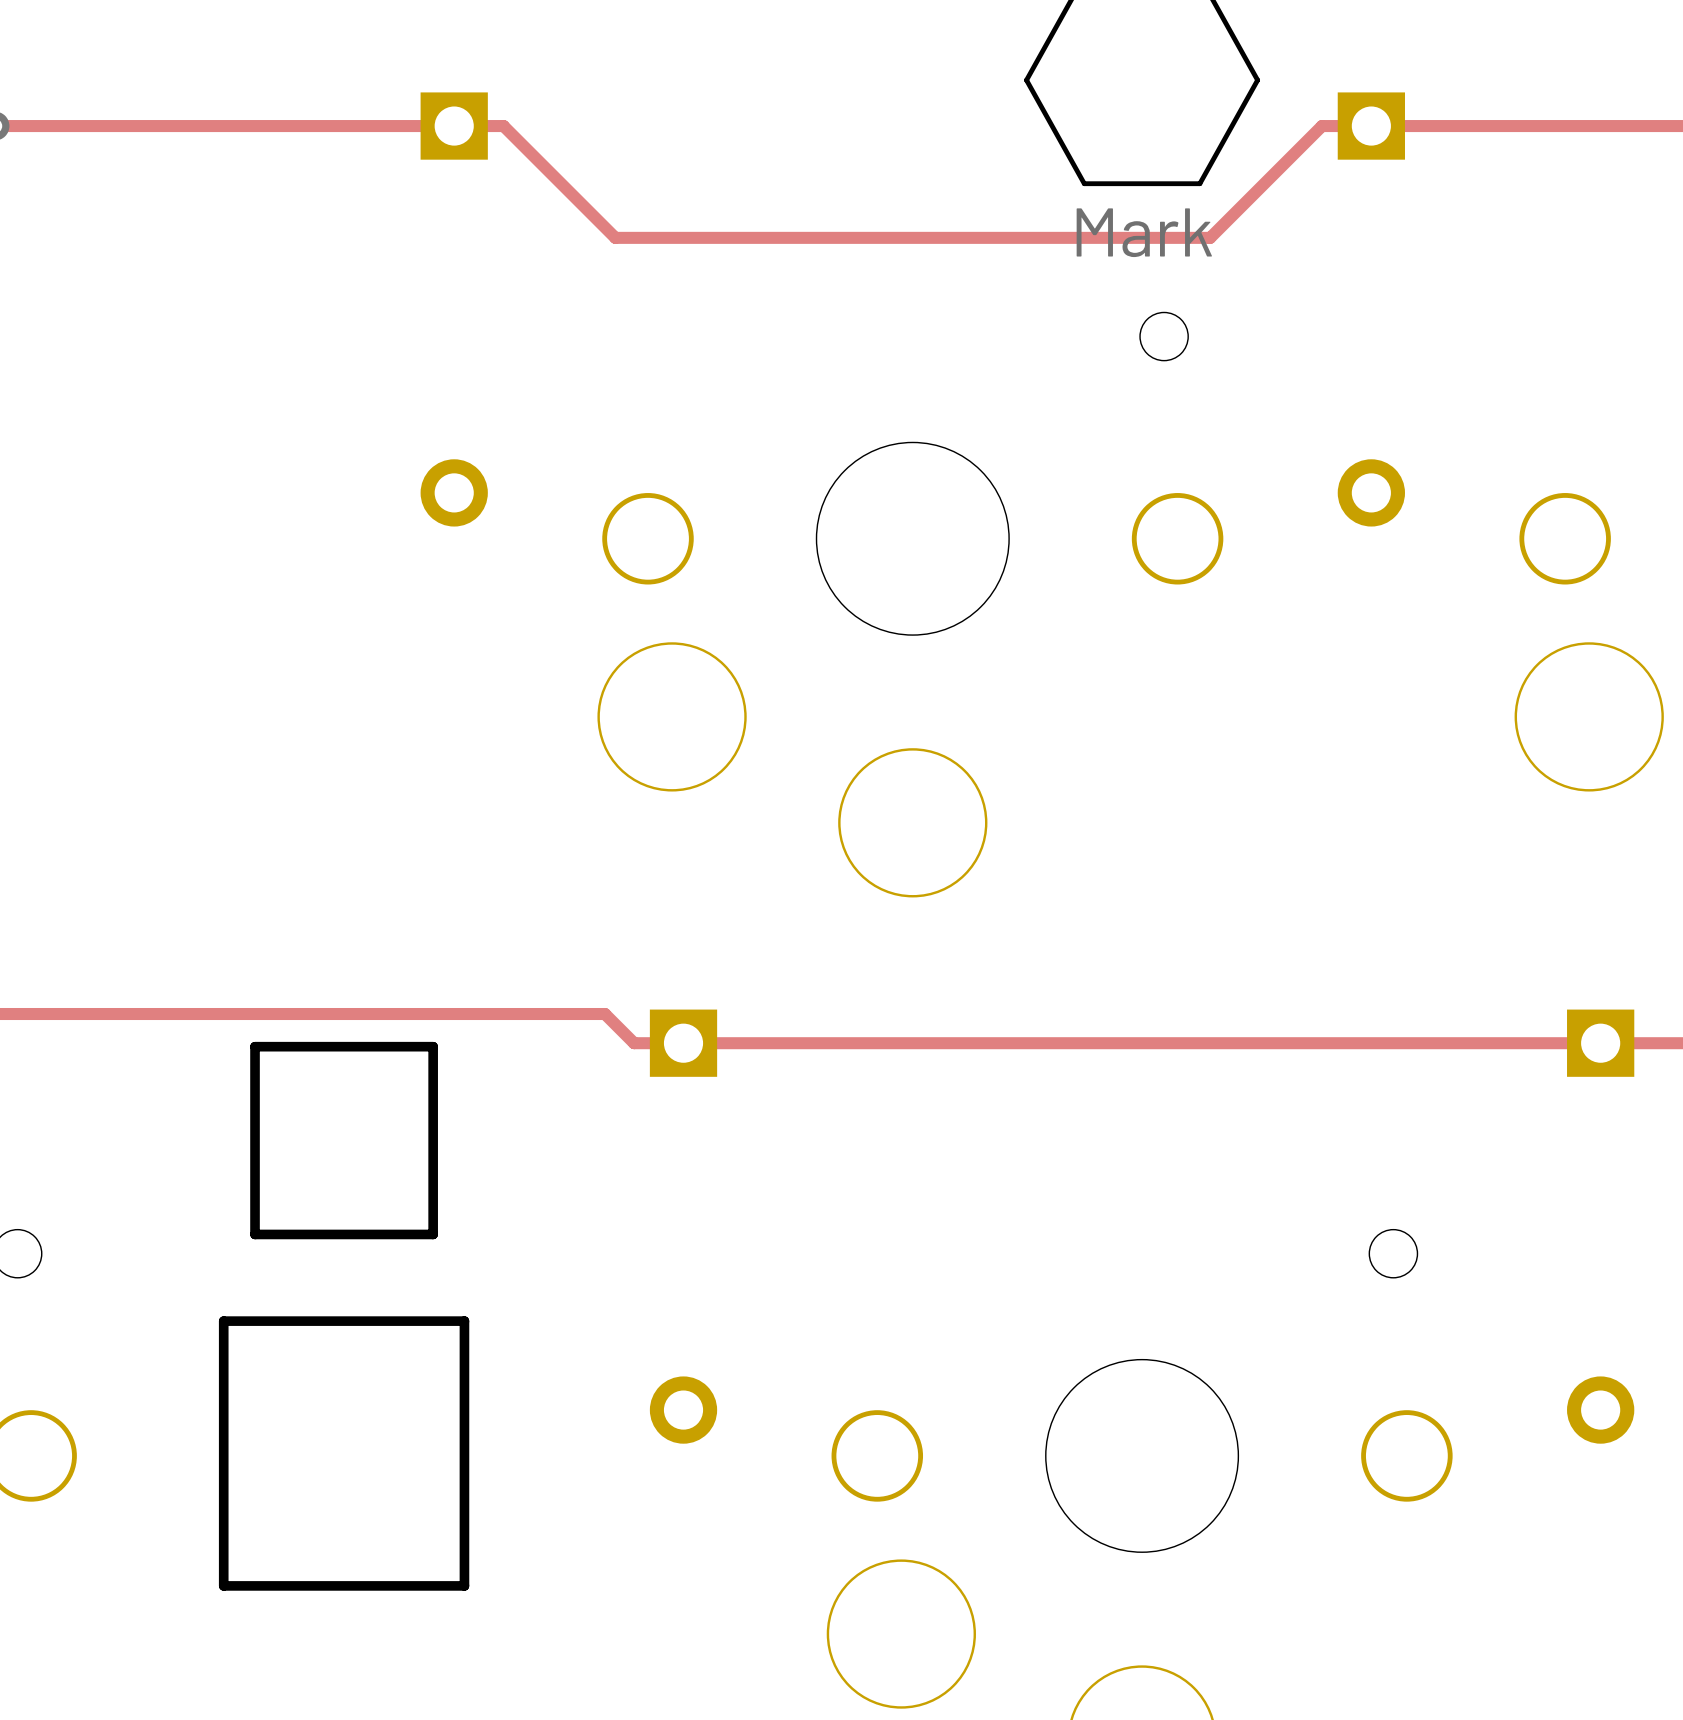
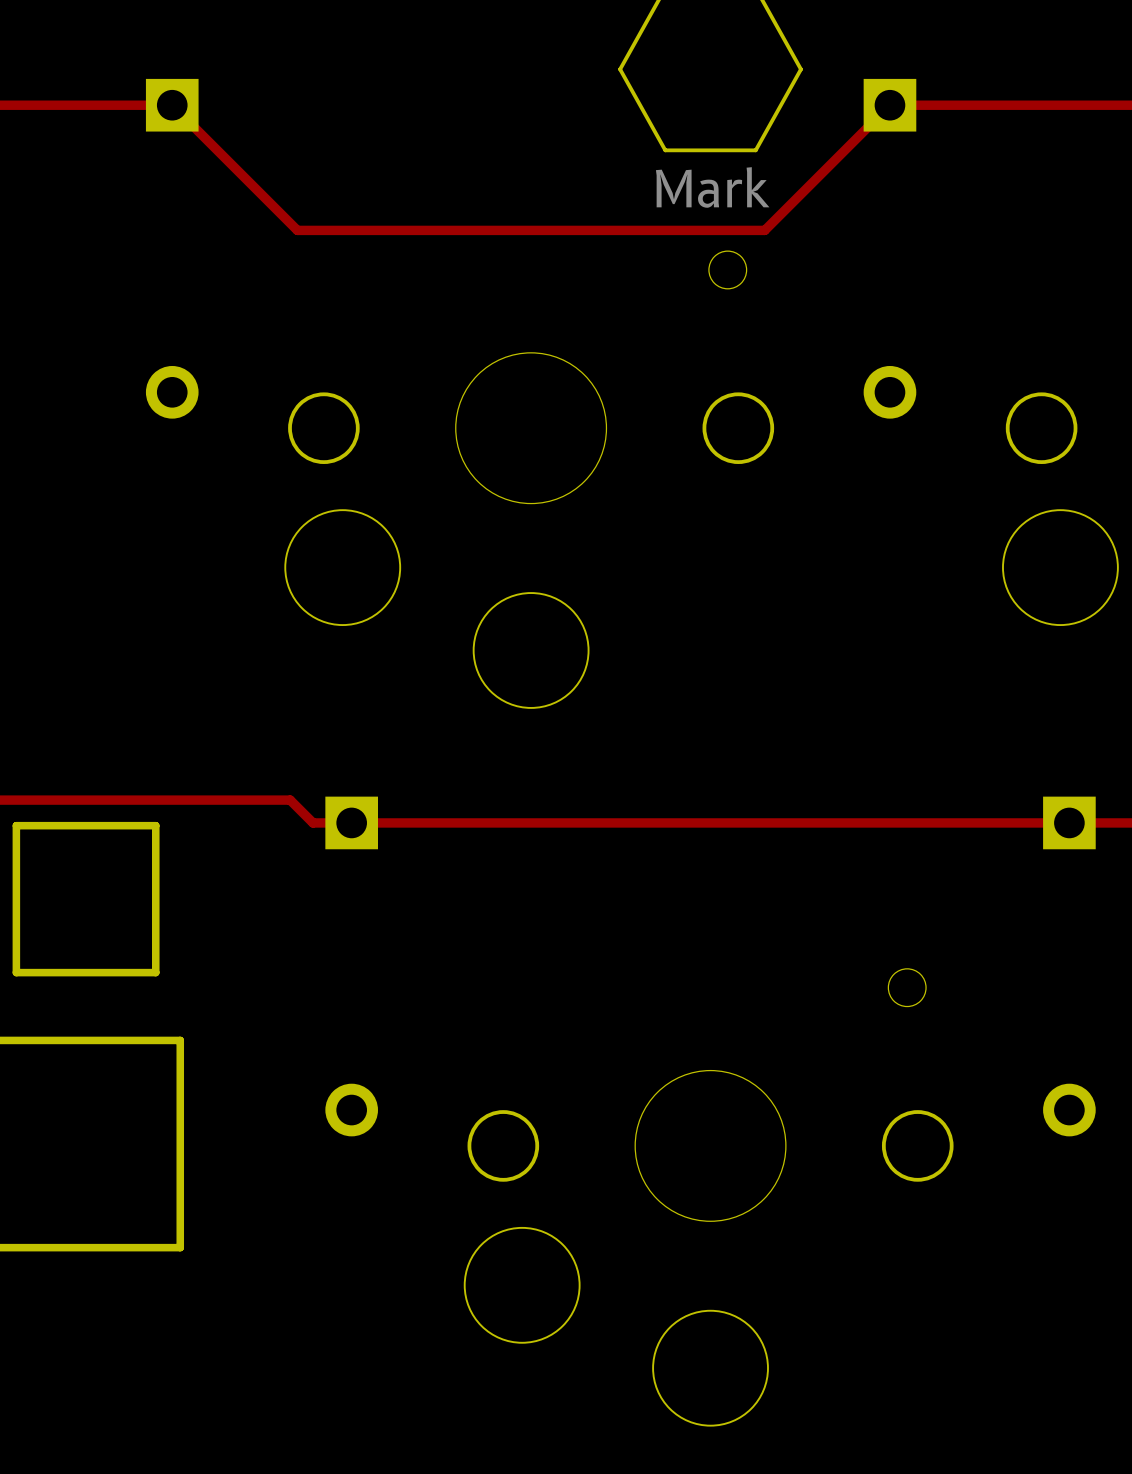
track: (454, 126) (503, 126) (615, 237) (1210, 237) (1322, 126) (1371, 126) -> (172, 105) (297, 230) (764, 230) (889, 105)

